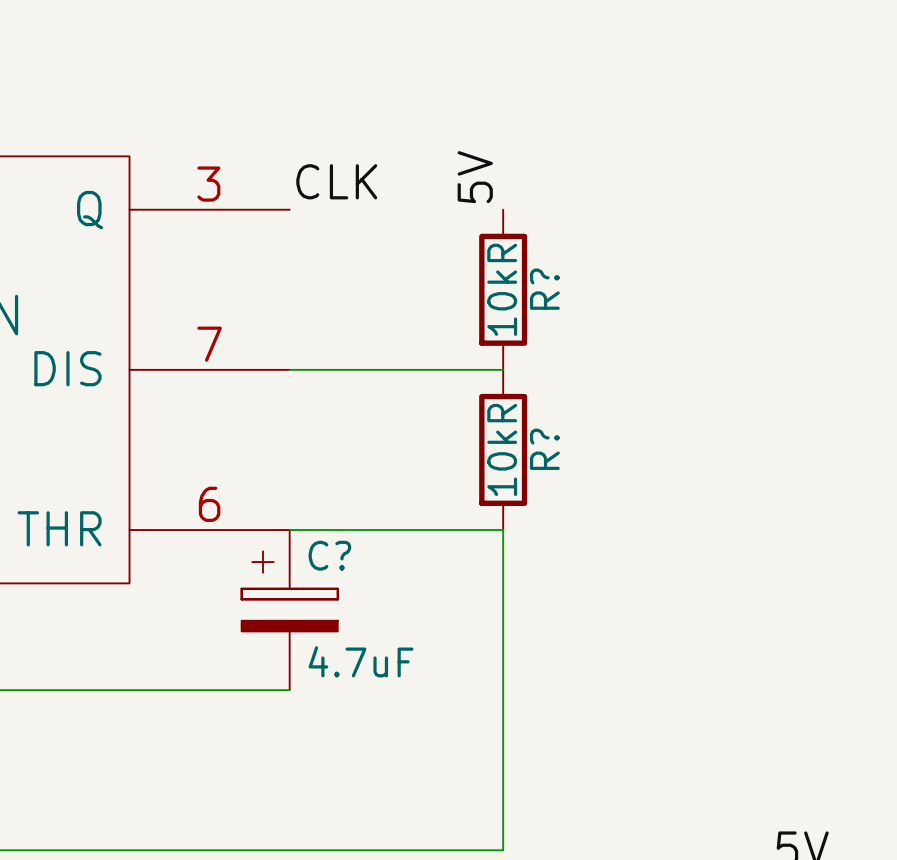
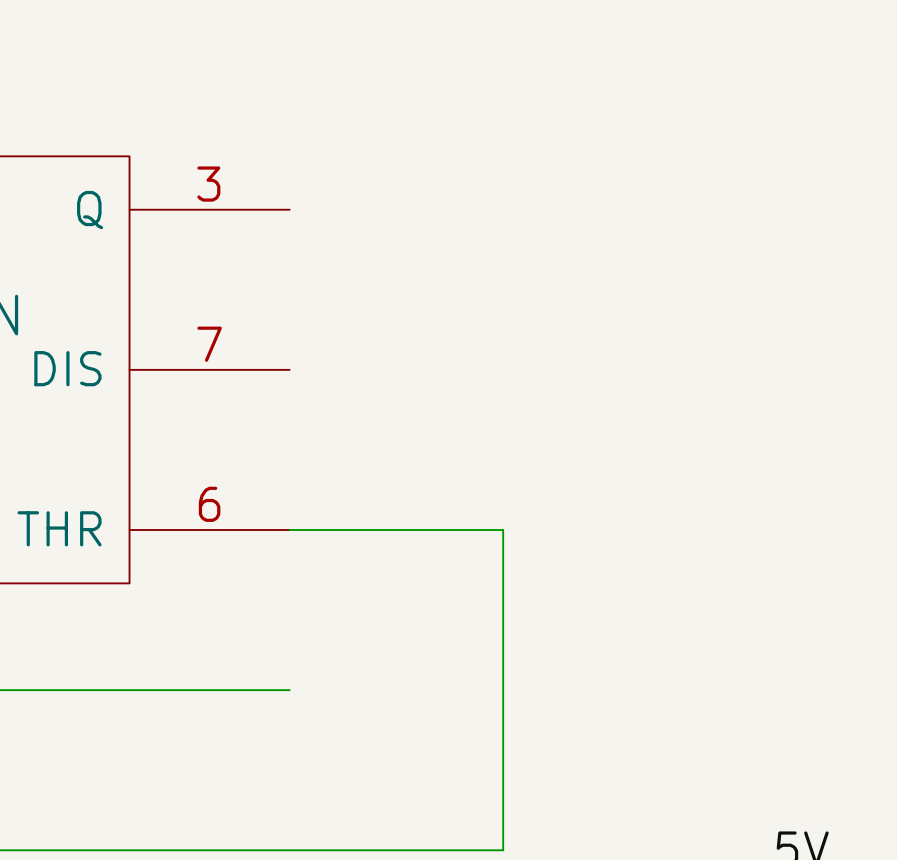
label: 5V (475, 177) -> none
label: CLK (336, 181) -> none
R?: 10kR (503, 289) -> none
wire: (289, 369) (503, 369) -> none
R?: 10kR (503, 449) -> none
C?: 4.7uF (289, 610) -> none

